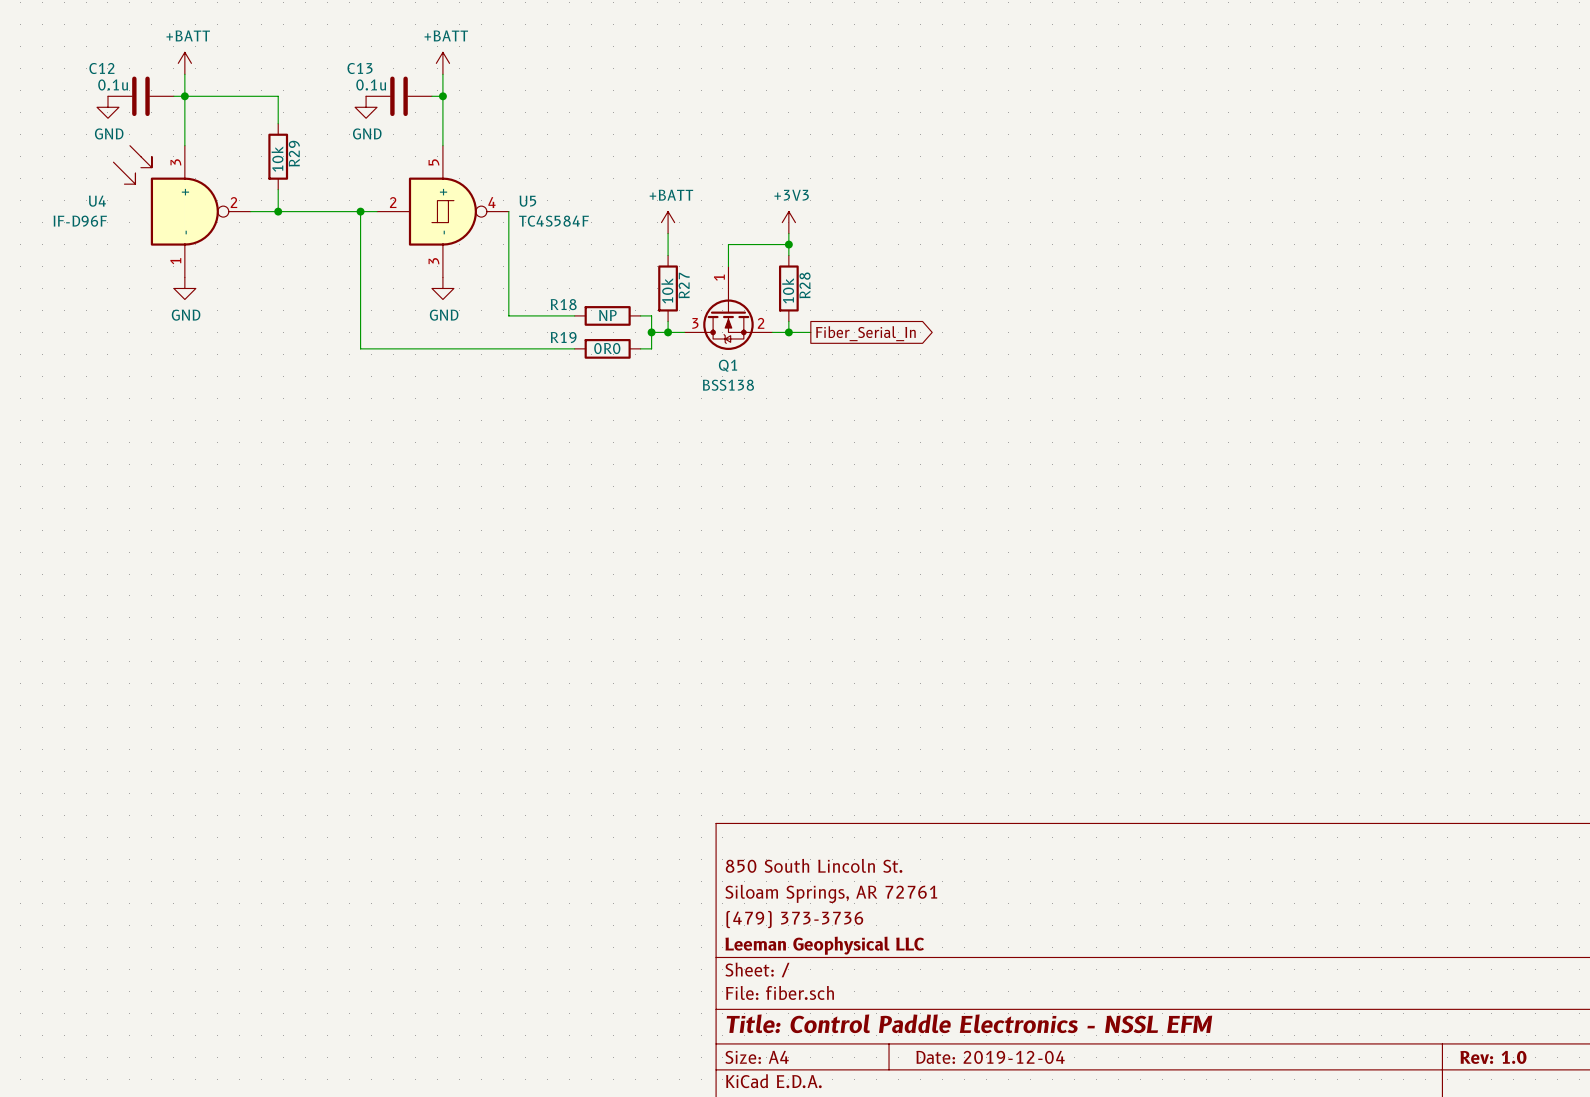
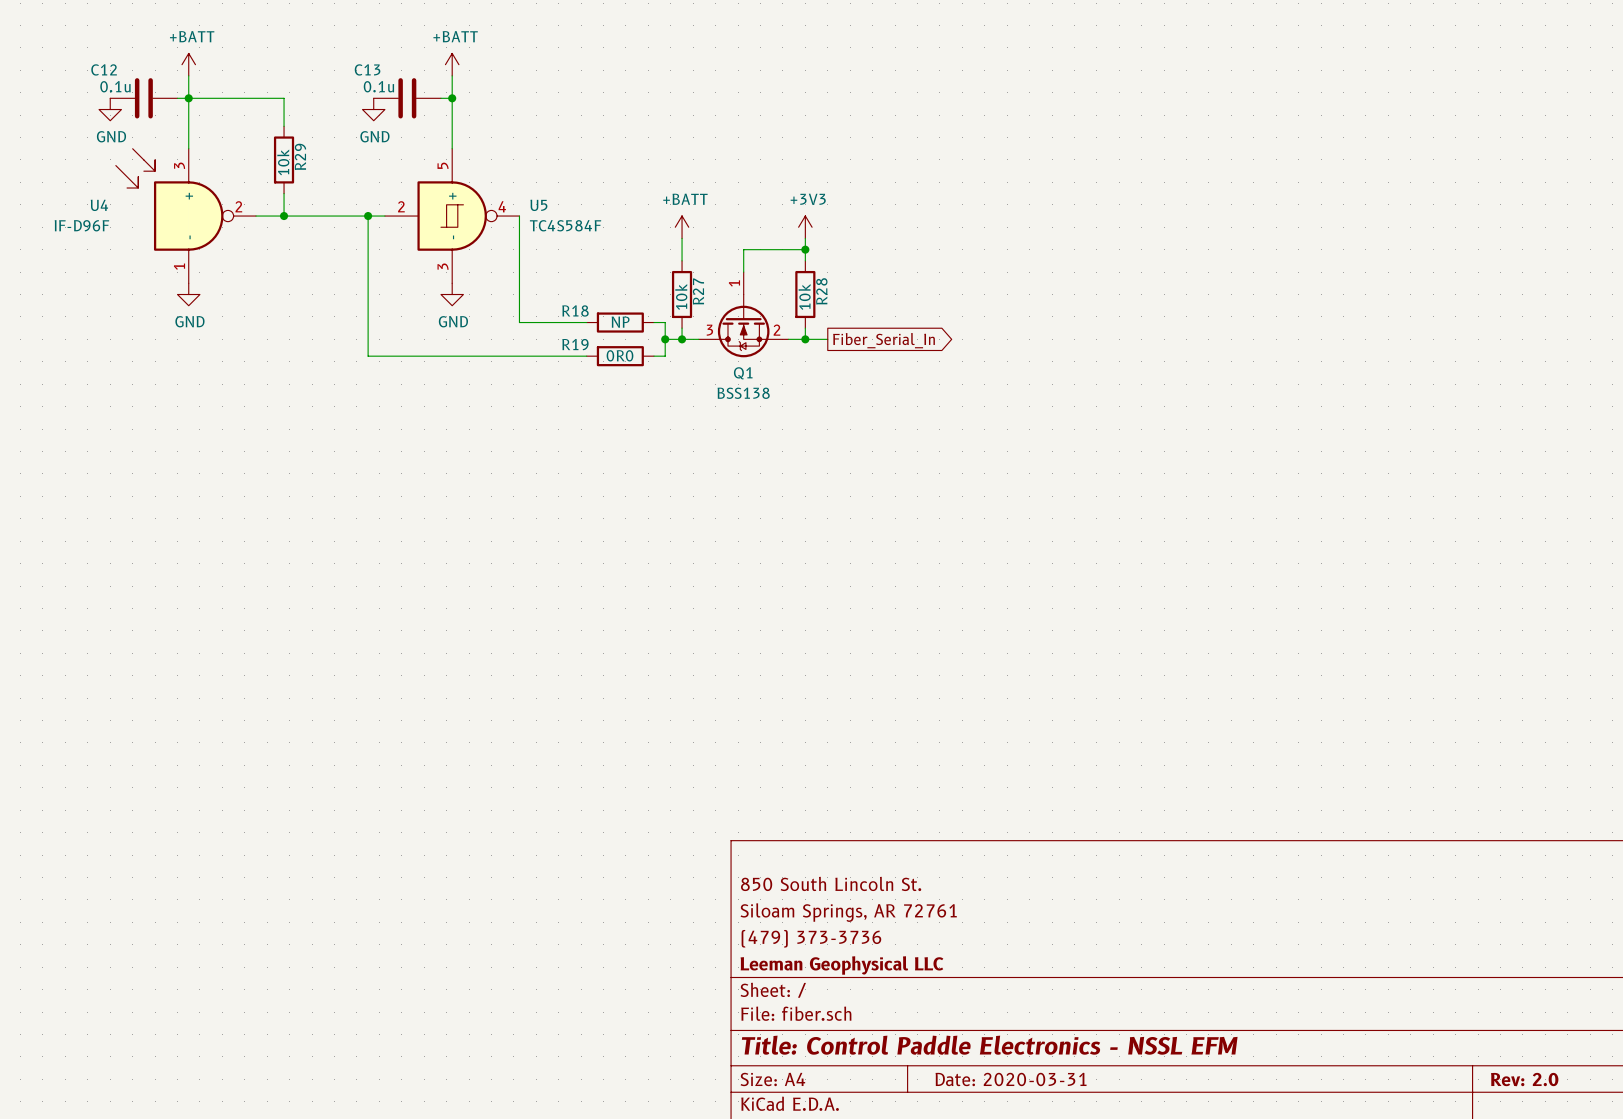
title block: Date: 2019-12-04 (990, 1057) -> Date: 2020-03-31 (1011, 1079)
title block: Rev: 1.0 (1493, 1057) -> Rev: 2.0 (1524, 1079)

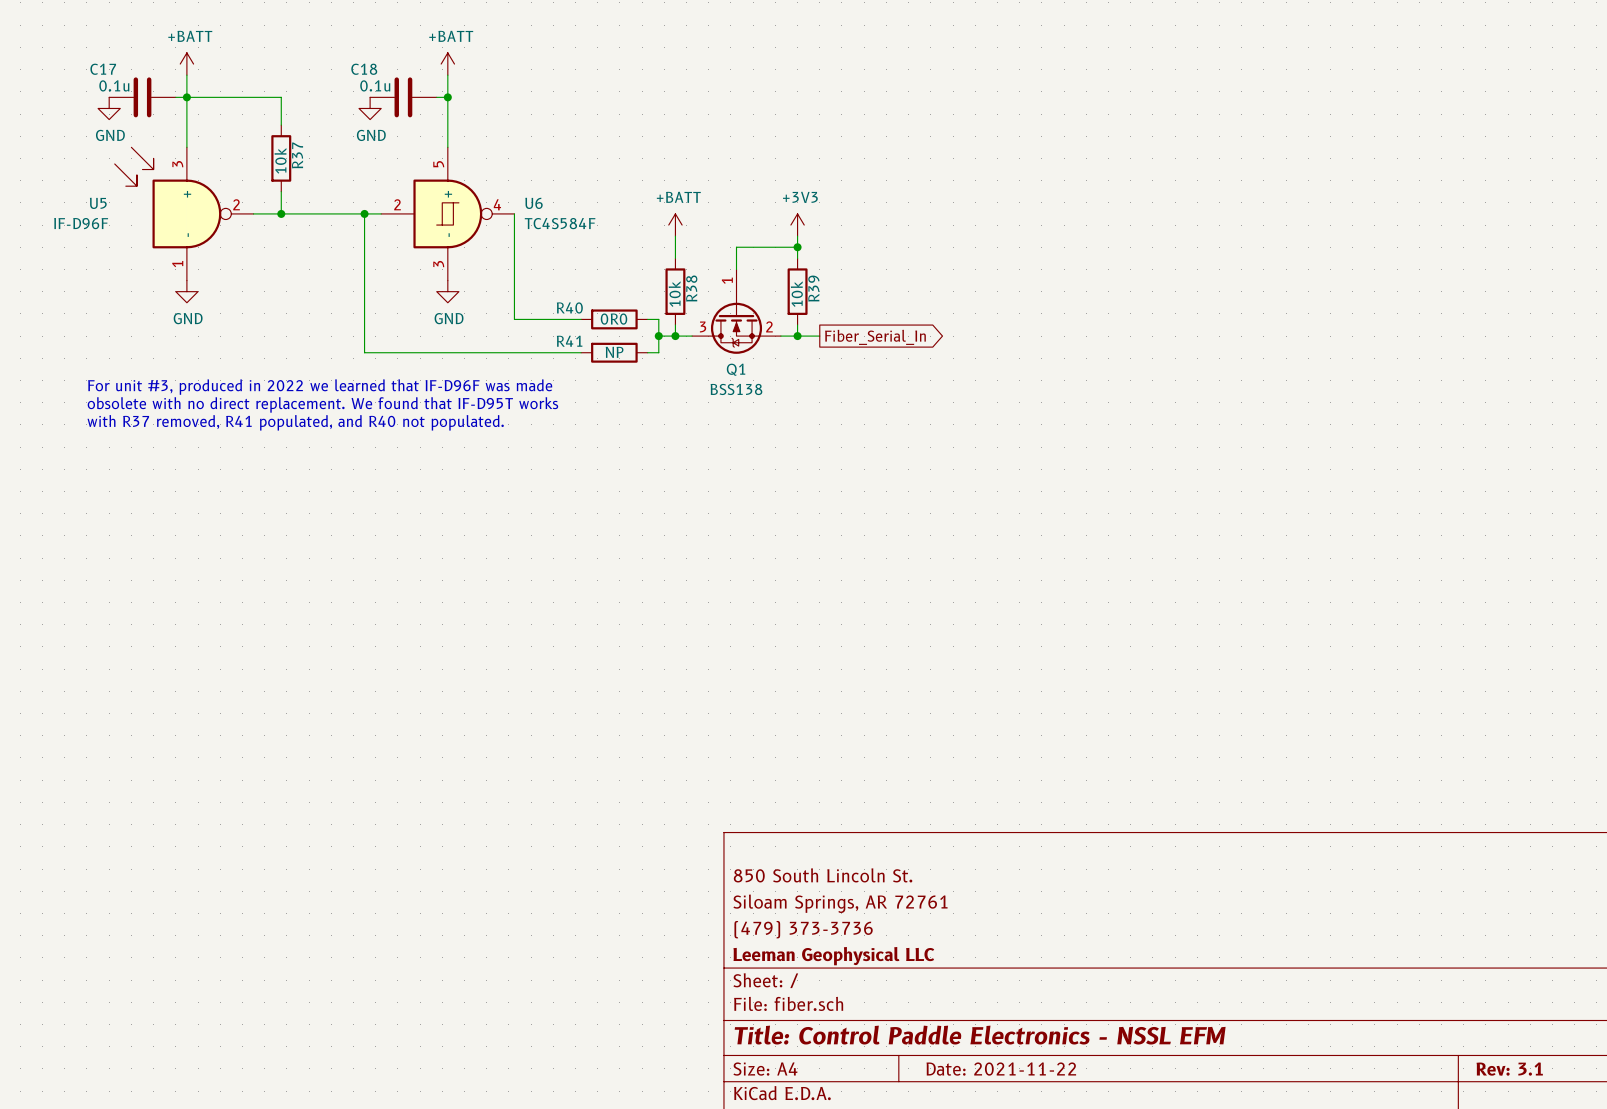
C12 name: C12 (104, 69) -> C17 (103, 69)
C13 name: C13 (367, 69) -> C18 (364, 69)
R29 name: R29 (300, 156) -> R37 (297, 155)
U4 name: U4 (99, 205) -> U5 (98, 203)
U5 name: U5 (538, 205) -> U6 (533, 203)
R27 name: R27 (698, 291) -> R38 (691, 288)
R28 name: R28 (821, 291) -> R39 (813, 288)
R18 name: R18 (575, 310) -> R40 (569, 307)
R18 value: NP (620, 322) -> 0R0 (614, 319)
R19 name: R19 (575, 344) -> R41 (569, 341)
R19 value: 0R0 (620, 355) -> NP (614, 352)
text: none -> For unit #3, produced in 2022 we learned that IF-D96F was made (320, 387)
text: none -> obsolete with no direct replacement. We found that IF-D95T works (322, 404)
text: none -> with R37 removed, R41 populated, and R40 not populated. (295, 422)
title block: Date: 2020-03-31 (1011, 1079) -> Date: 2021-11-22 (1001, 1069)
title block: Rev: 2.0 (1524, 1079) -> Rev: 3.1 (1509, 1069)

